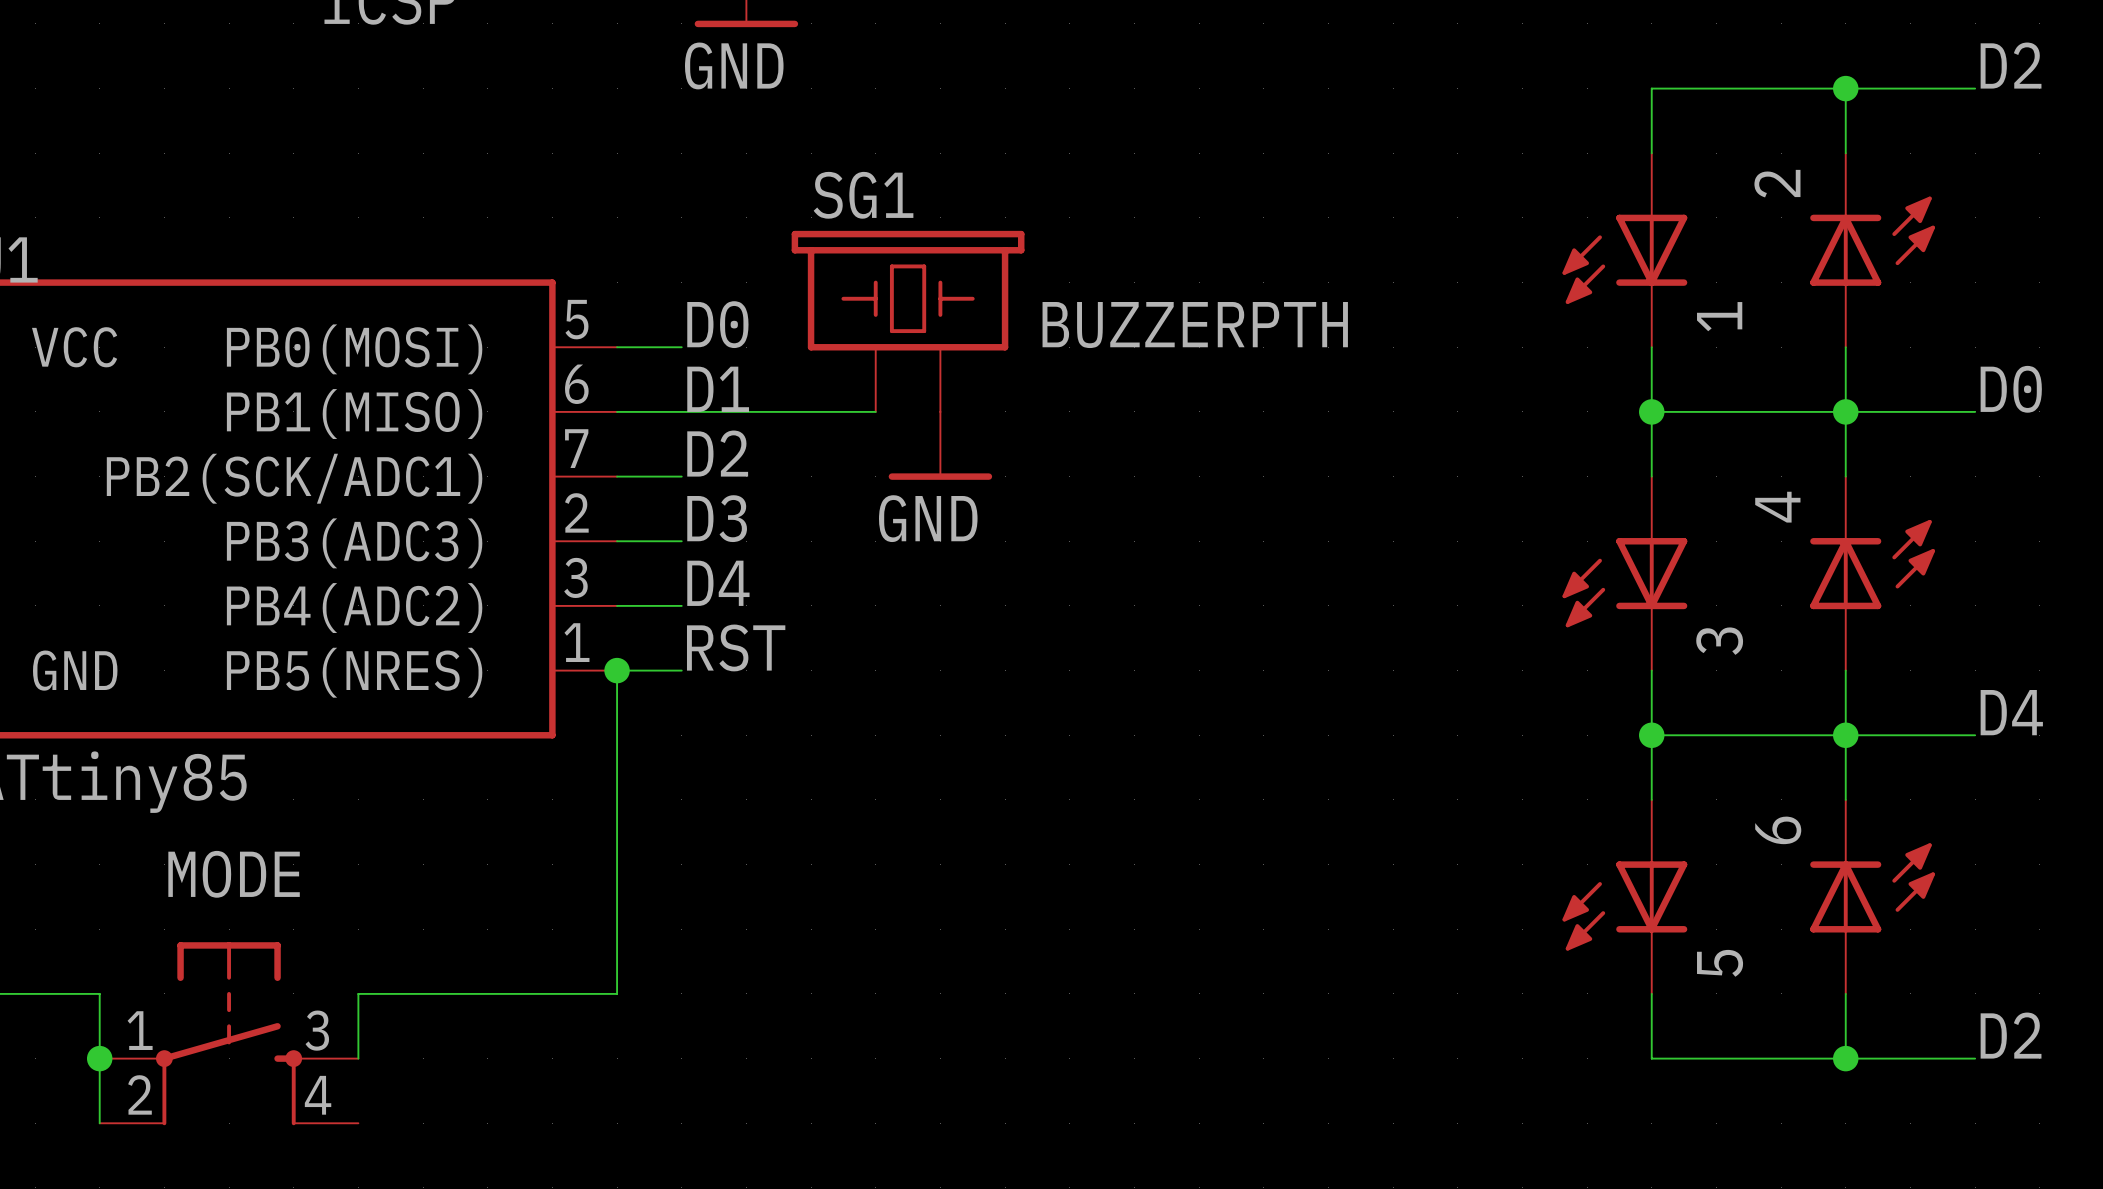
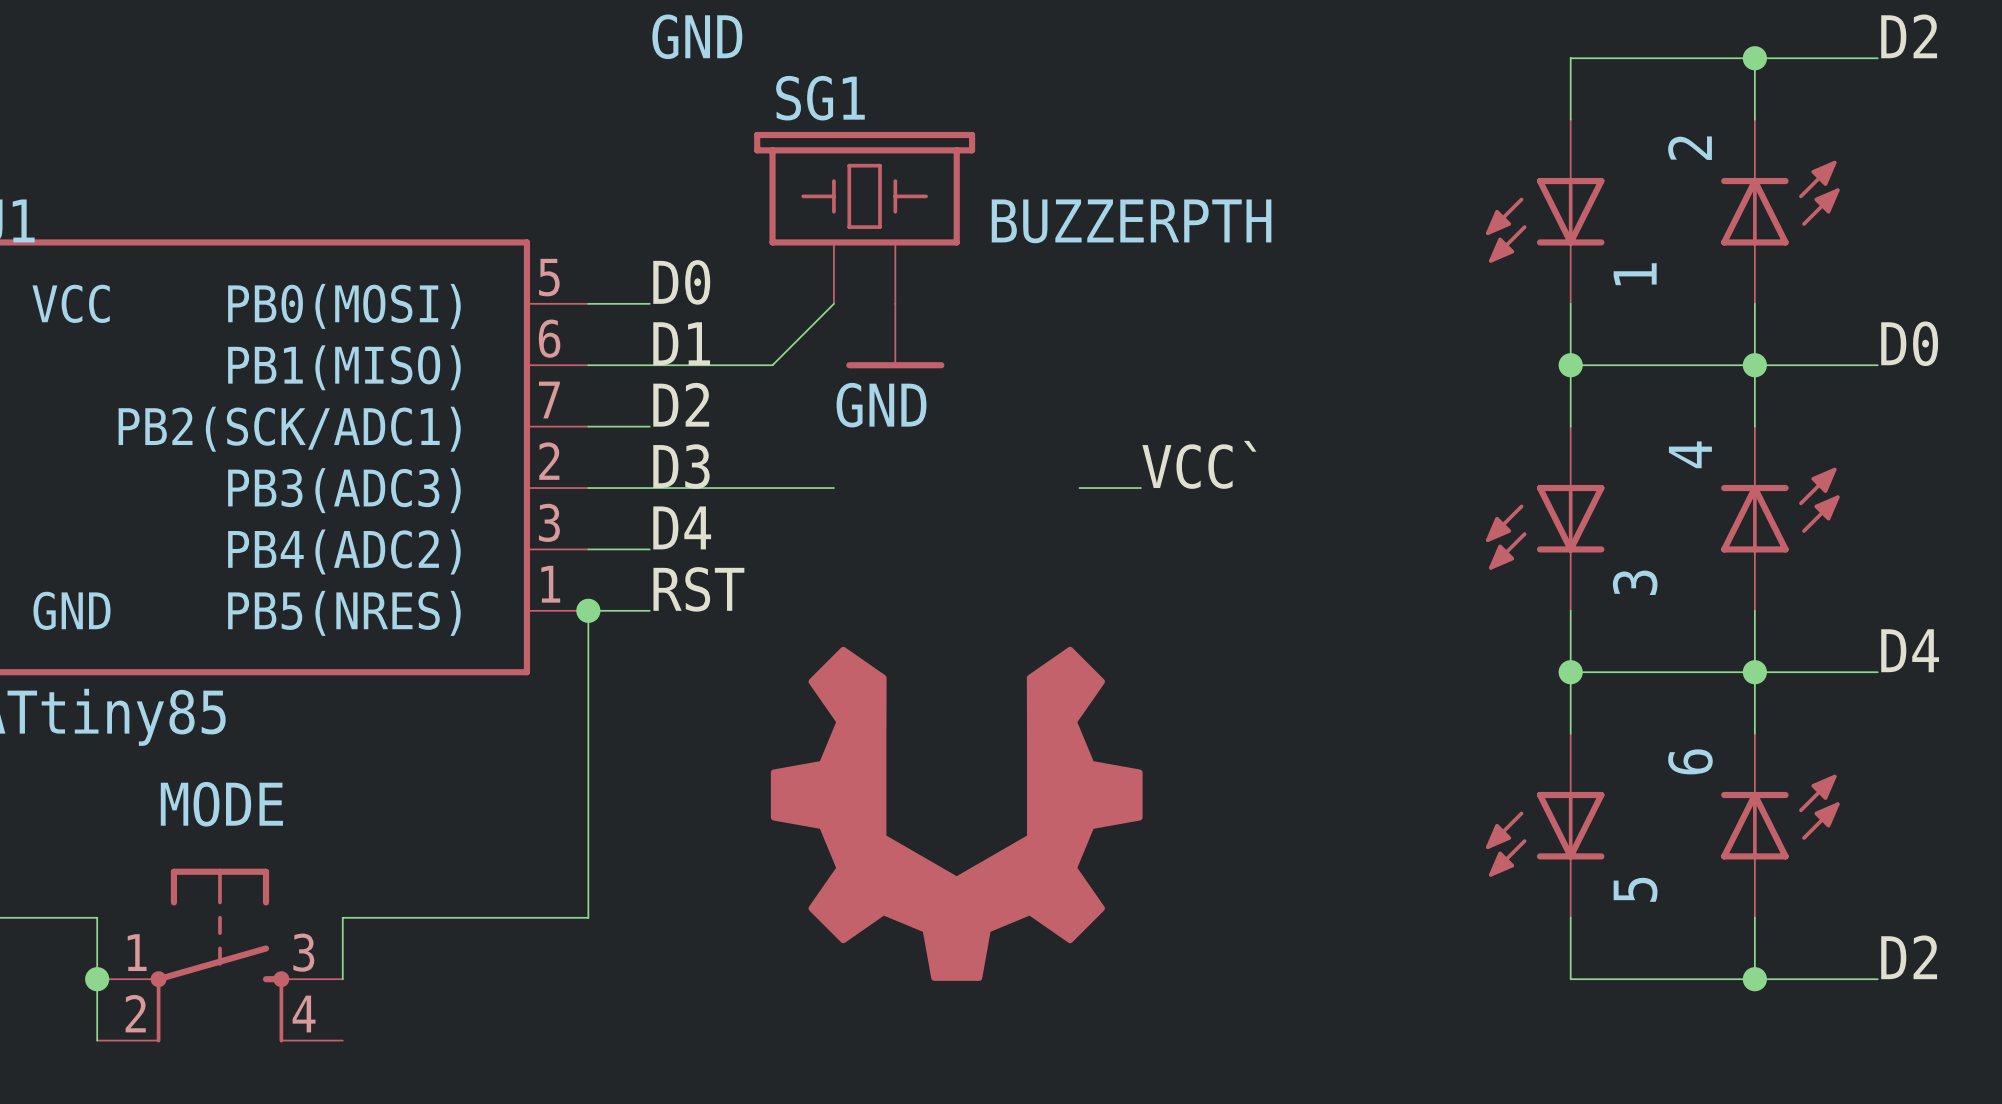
SG1 position: (908, 321) -> (864, 217)
wire: (811, 411) (875, 411) -> (772, 365) (833, 303)
power symbol position: GND (940, 445) -> GND (895, 336)
label: none -> VCC` (1199, 464)
wire: none -> (649, 488) (833, 488)
wire: none -> (1079, 488) (1140, 488)
part: none -> (956, 813)

